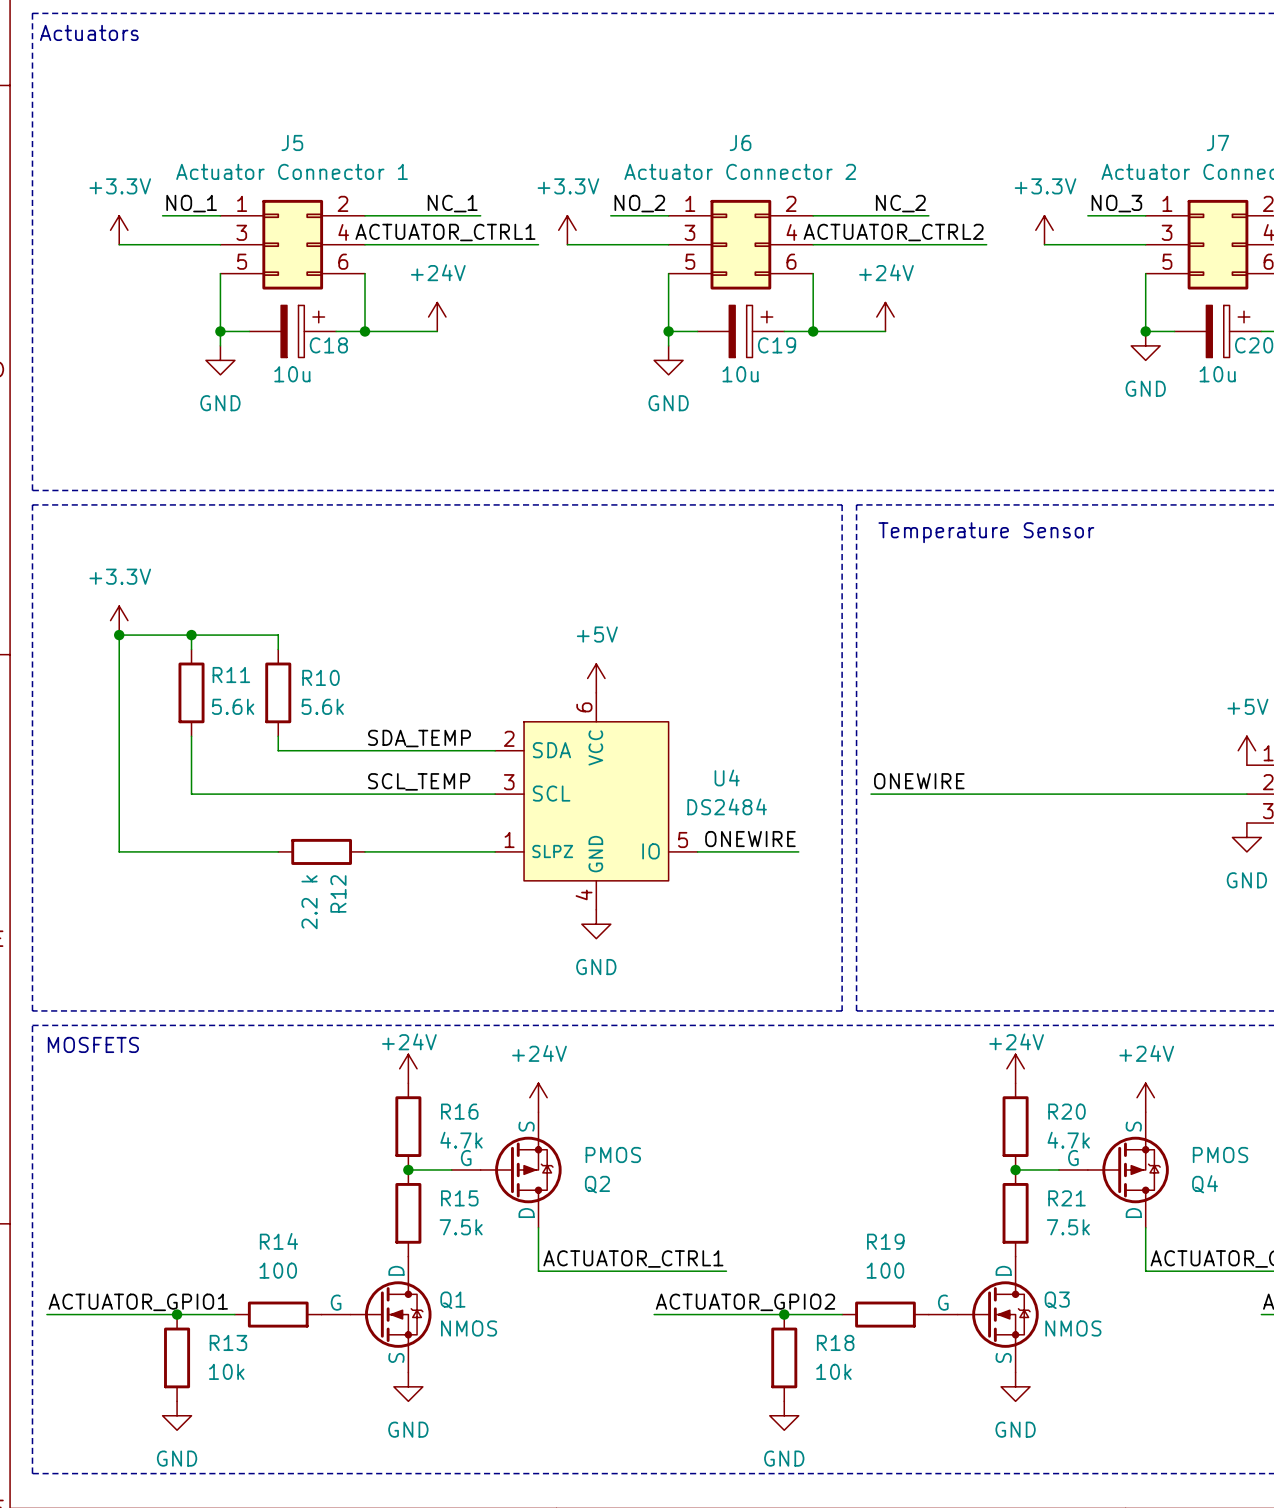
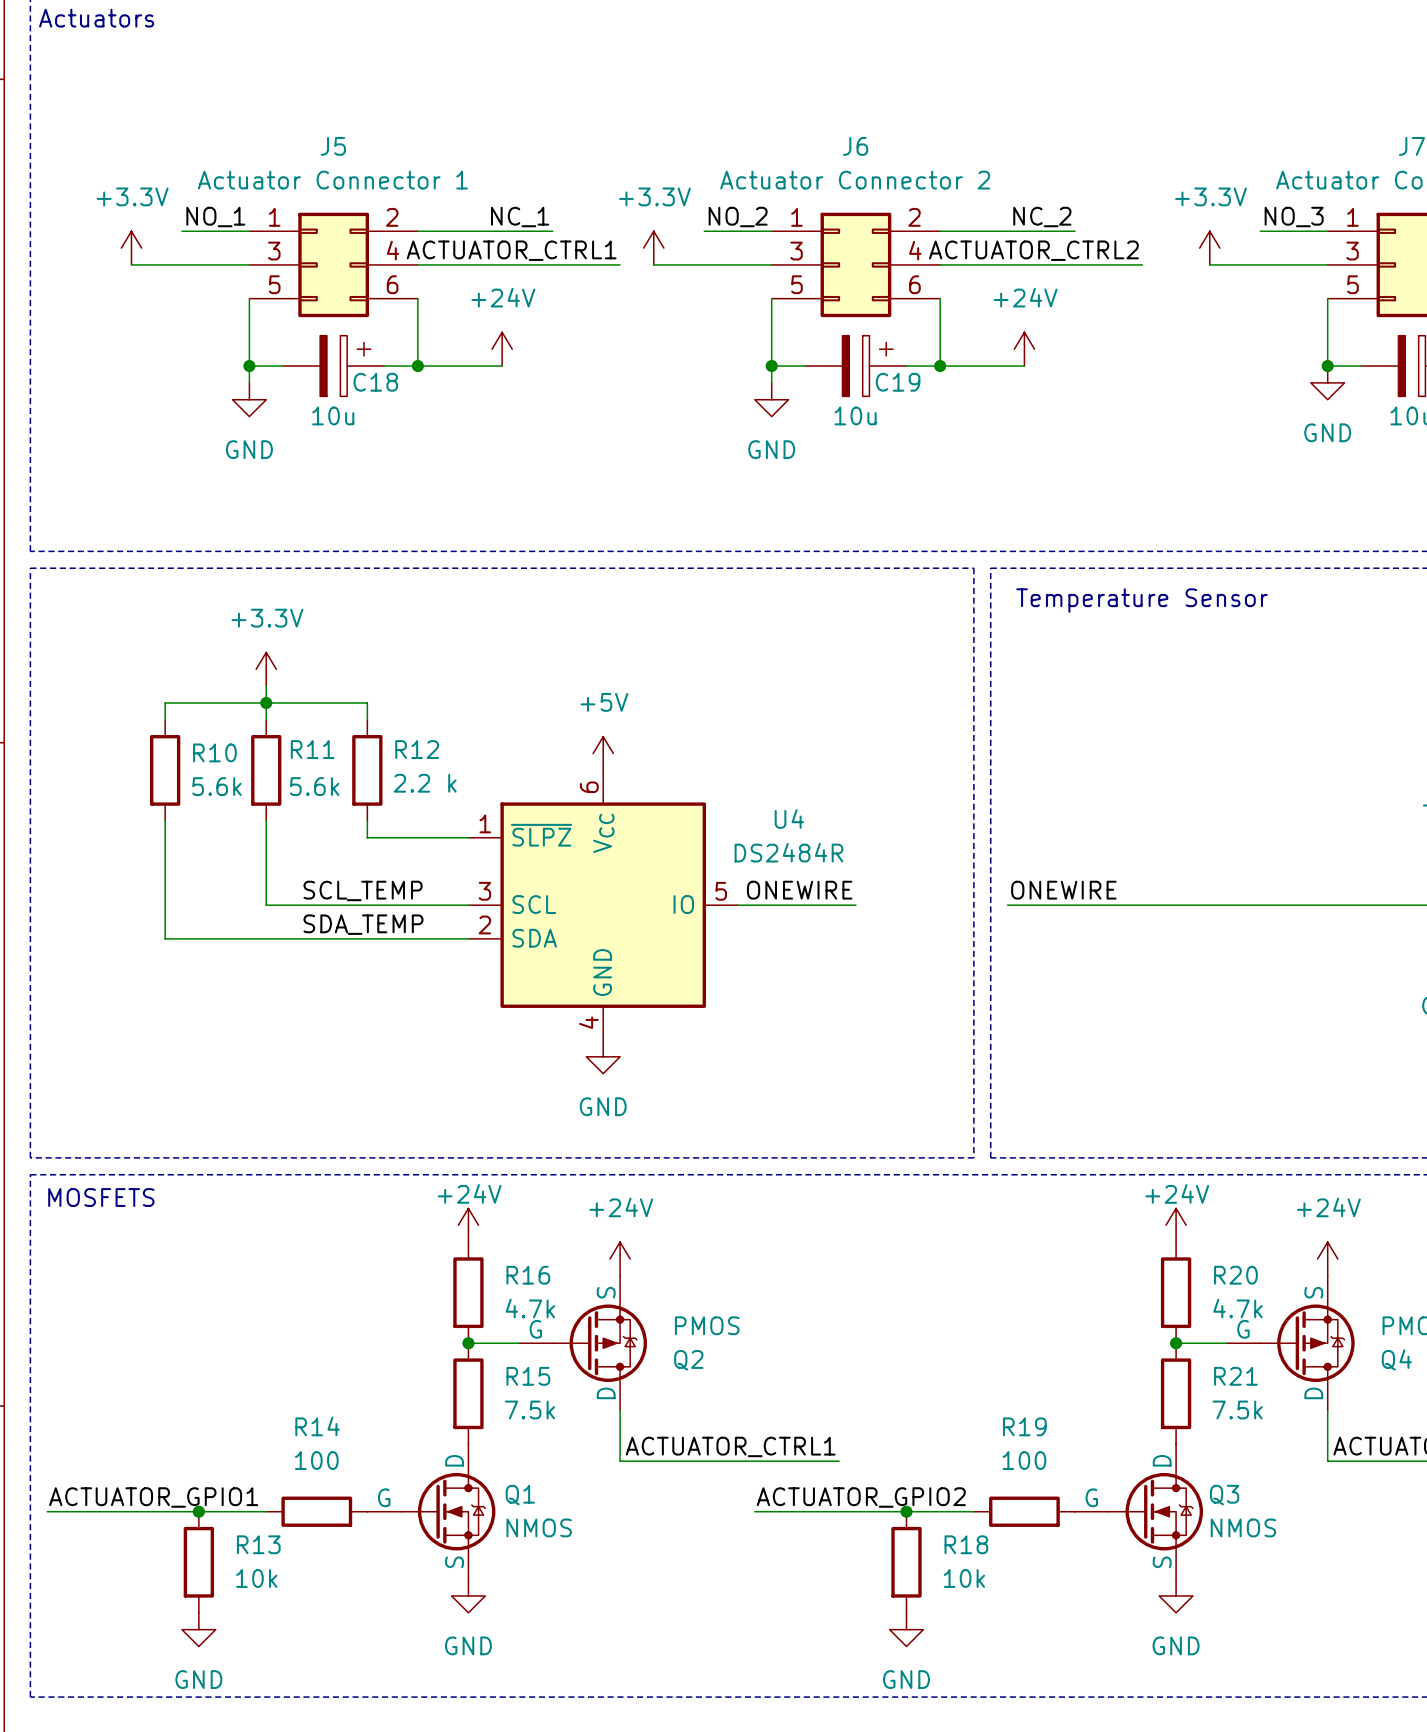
wire: none -> (266, 686) (266, 719)
power symbol position: +3.3V (119, 620) -> +3.3V (266, 669)
junction: (119, 635) -> none
wire: none -> (165, 719) (165, 703) (367, 703) (367, 719)
wire: (191, 635) (191, 649) -> none
junction position: (191, 635) -> (266, 703)
wire: (278, 649) (278, 635) (119, 635) (119, 851) (278, 851) -> none
power symbol position: +5V (596, 678) -> +5V (603, 753)
R11 position: (191, 692) -> (266, 770)
R10 position: (278, 692) -> (165, 770)
U4 symbol: [495, 692, 698, 910] -> [468, 770, 739, 1040]
wire: none -> (165, 820) (165, 938) (468, 938)
wire: none -> (367, 820) (367, 837) (468, 837)
wire: (191, 736) (191, 794) (234, 794) -> (266, 820) (266, 905)
wire: (278, 736) (278, 750) (495, 750) -> none
label position: SDA_TEMP (419, 738) -> SDA_TEMP (363, 924)
U4 name position: U4 (727, 777) -> U4 (789, 818)
label position: SCL_TEMP (419, 781) -> SCL_TEMP (363, 890)
U4 value: DS2484 (727, 806) -> DS2484R (788, 852)
label position: ONEWIRE (750, 839) -> ONEWIRE (799, 890)
R12 rotation: 0° (321, 851) -> 90° clockwise (367, 770)
R12 position: (321, 851) -> (367, 770)
wire: (365, 851) (495, 851) -> none
wire: (697, 851) (798, 851) -> (738, 905) (855, 905)
R12 name position: R12 (338, 893) -> R12 (417, 749)
R12 value position: 2.2 k (309, 902) -> 2.2 k (425, 783)
power symbol position: GND (596, 924) -> GND (603, 1056)

